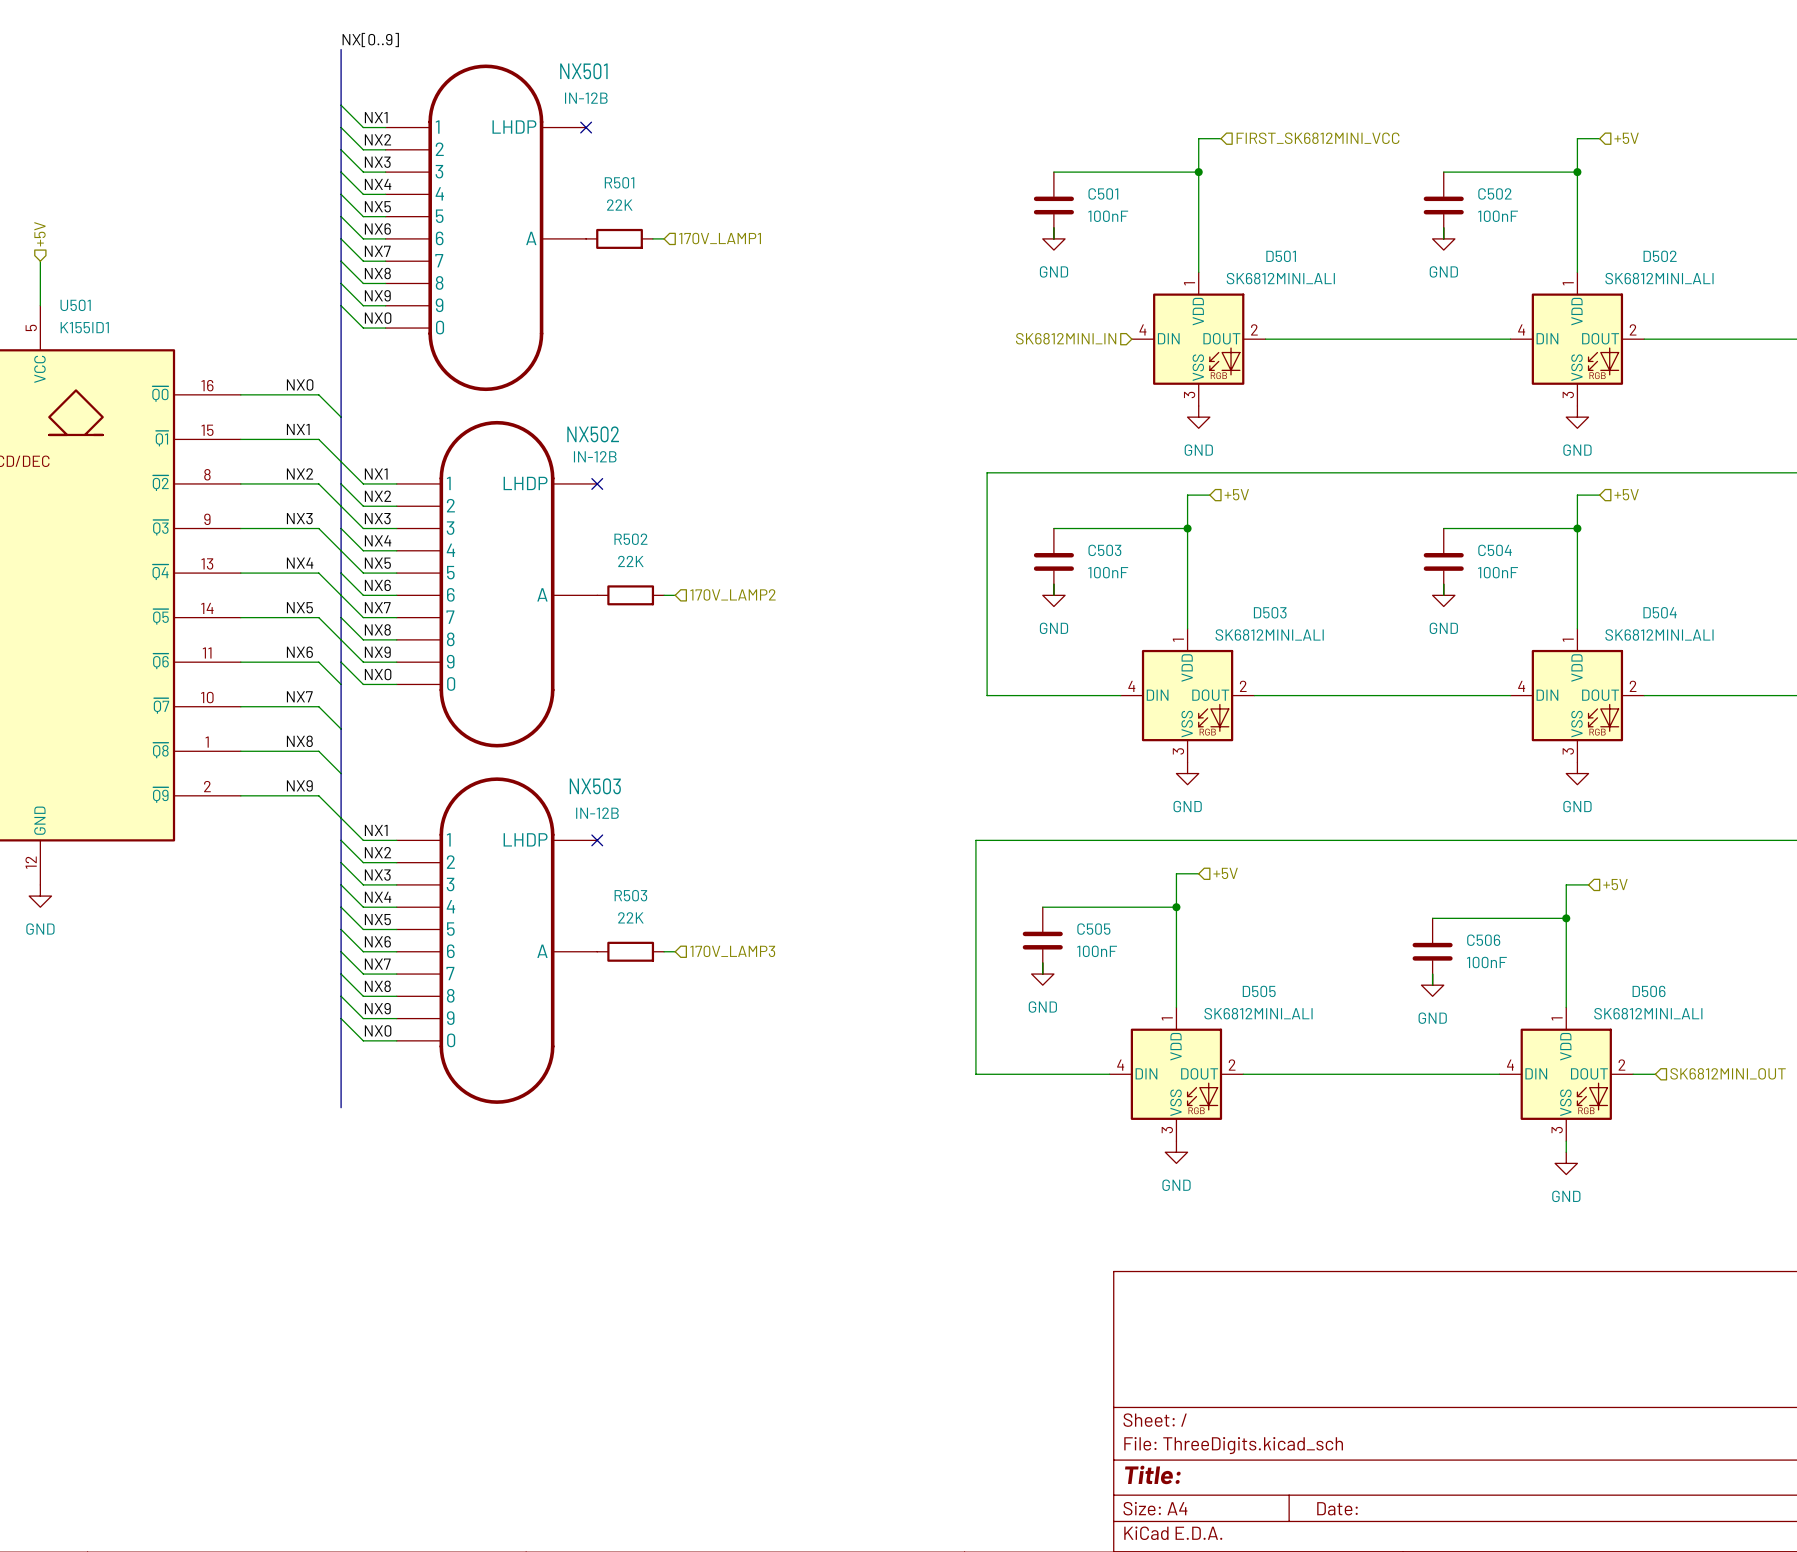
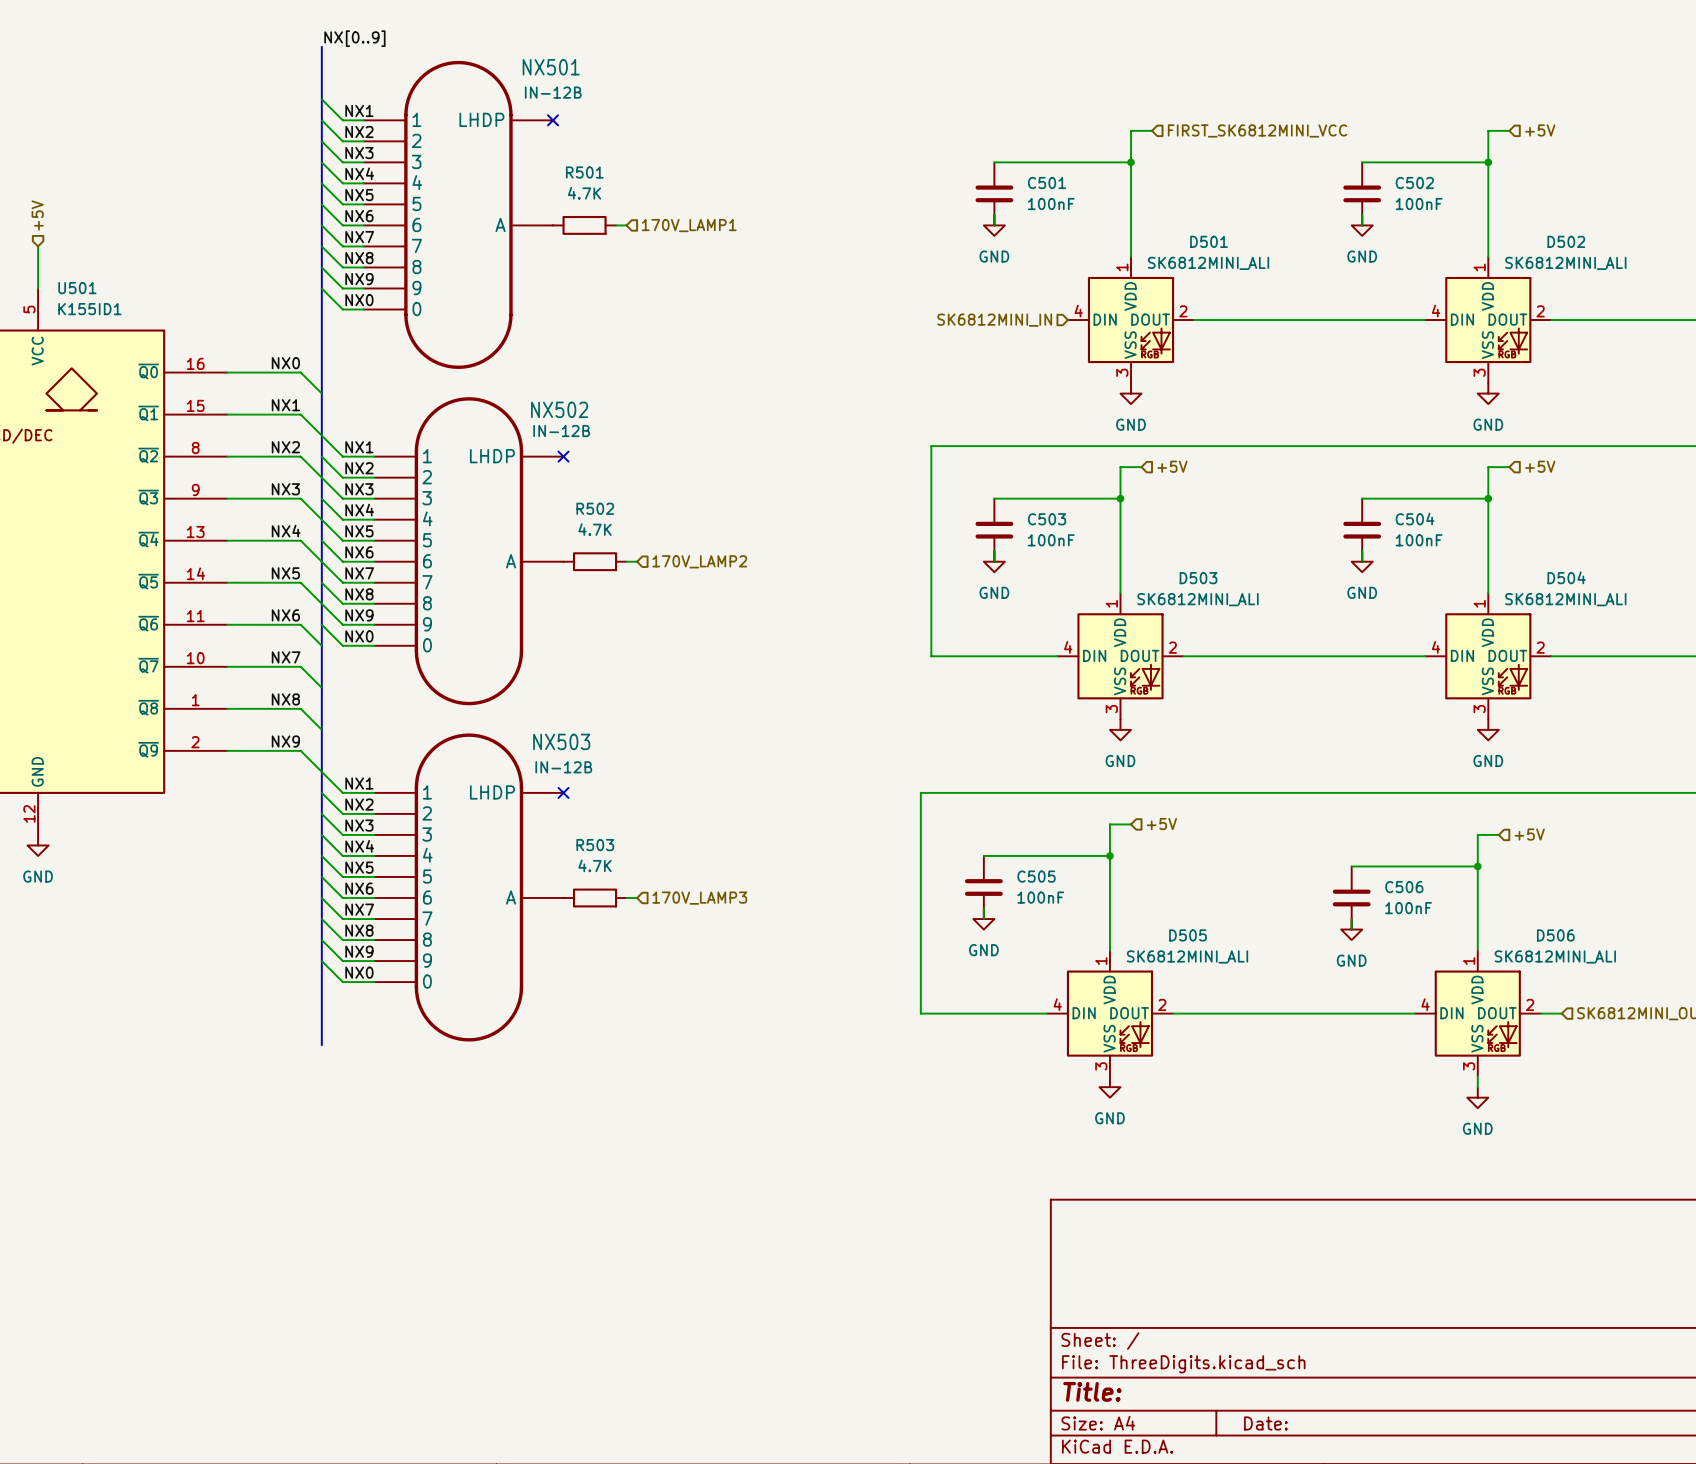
R501 value: 22K (619, 205) -> 4.7K (584, 193)
R502 value: 22K (630, 561) -> 4.7K (595, 529)
R503 value: 22K (630, 917) -> 4.7K (595, 865)

